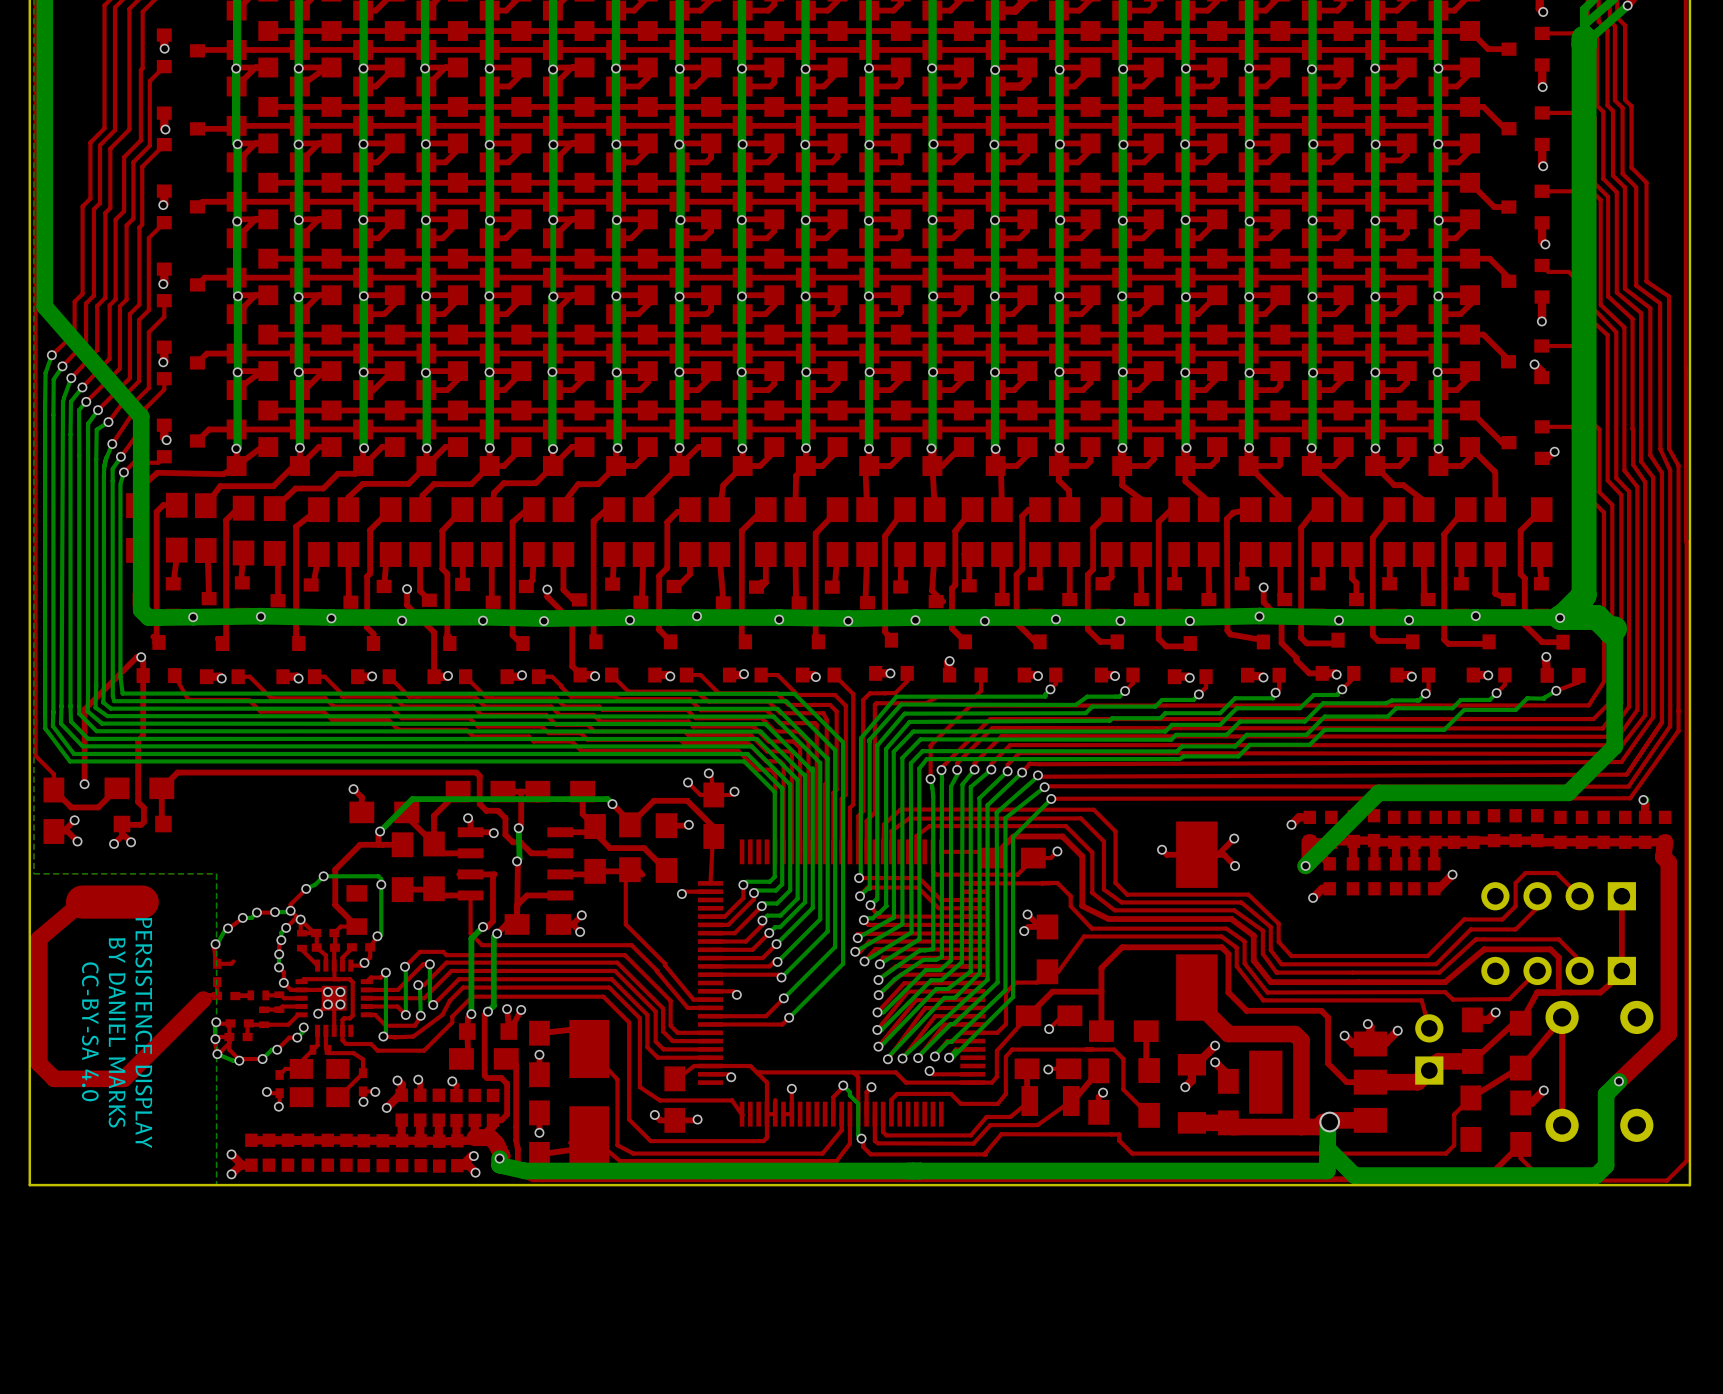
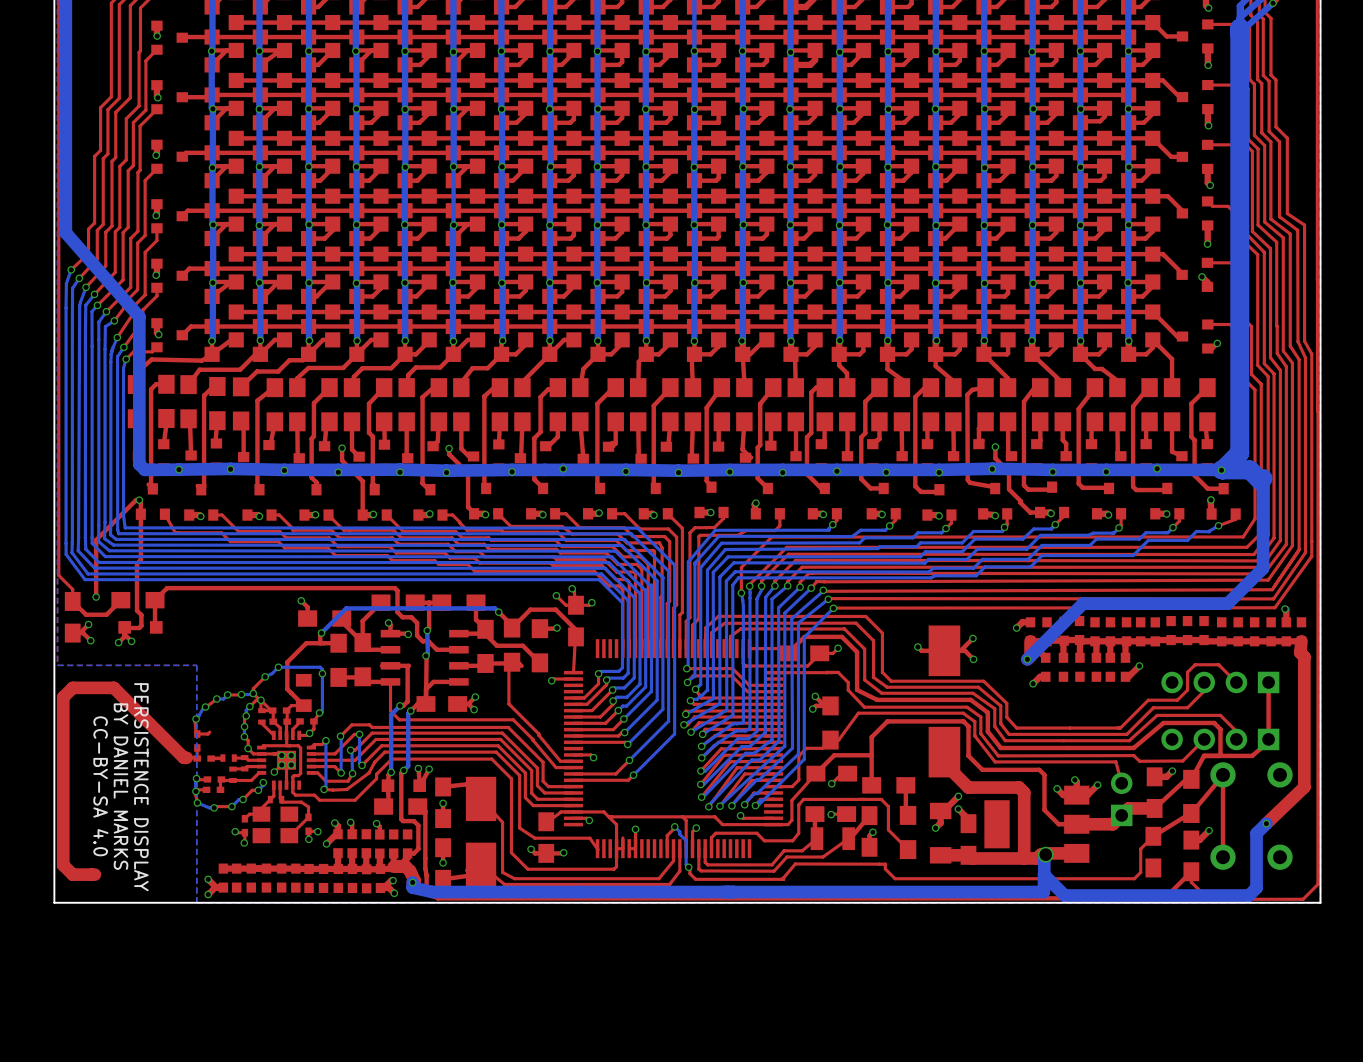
top track: (144, 904) (142, 902) (82, 902) (39, 938) (39, 1063) (54, 1078) (124, 1078) (203, 999) -> none
top track: none -> (186, 757) (183, 757) (113, 687) (72, 687) (63, 697) (63, 865) (72, 874) (94, 874)
top track: (230, 1023) (229, 1049) (239, 1060) -> none
top track: (229, 1043) (217, 1054) -> none

